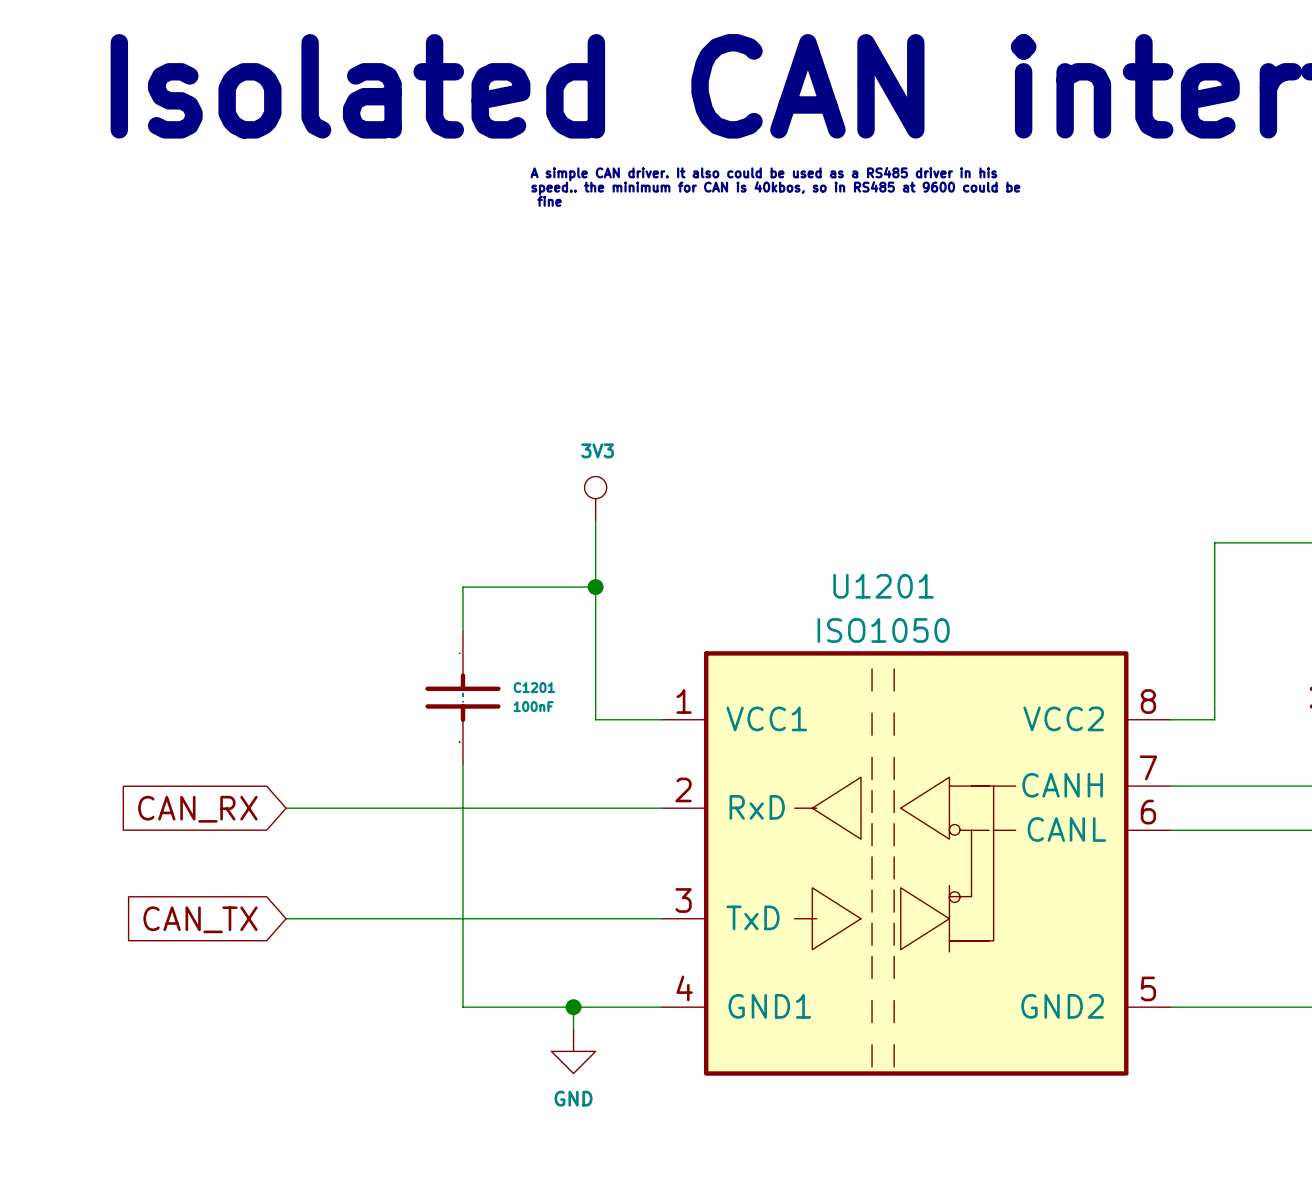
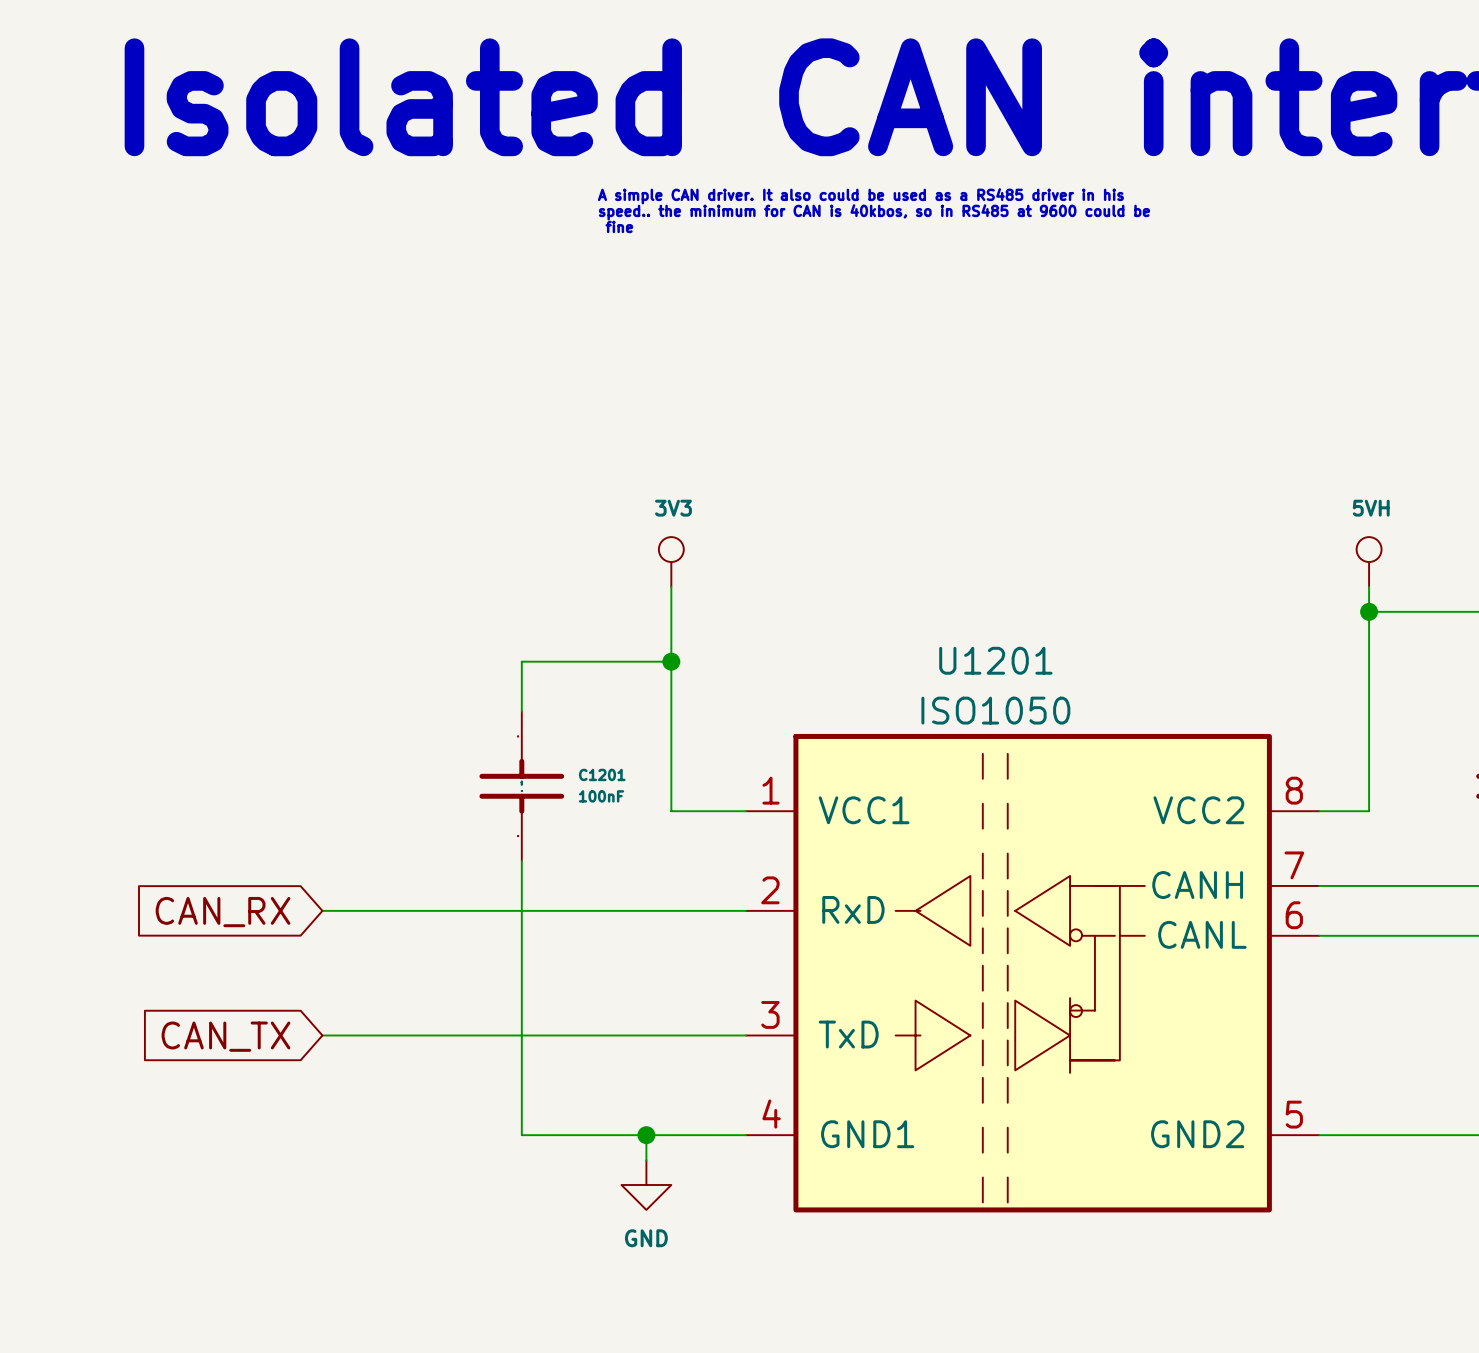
power symbol: none -> 5VH (1369, 562)
wire: none -> (1369, 586) (1369, 611)
junction: none -> (1369, 611)

